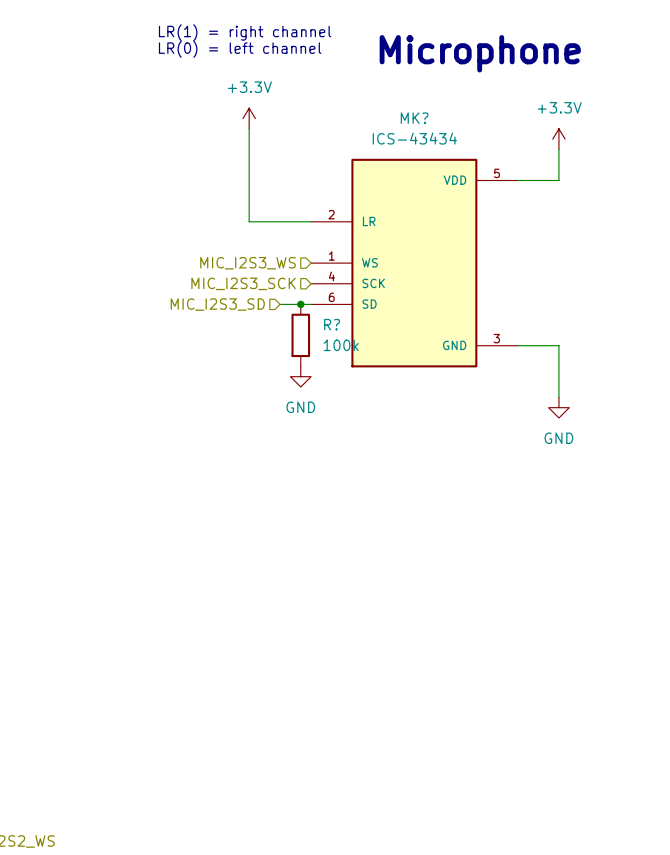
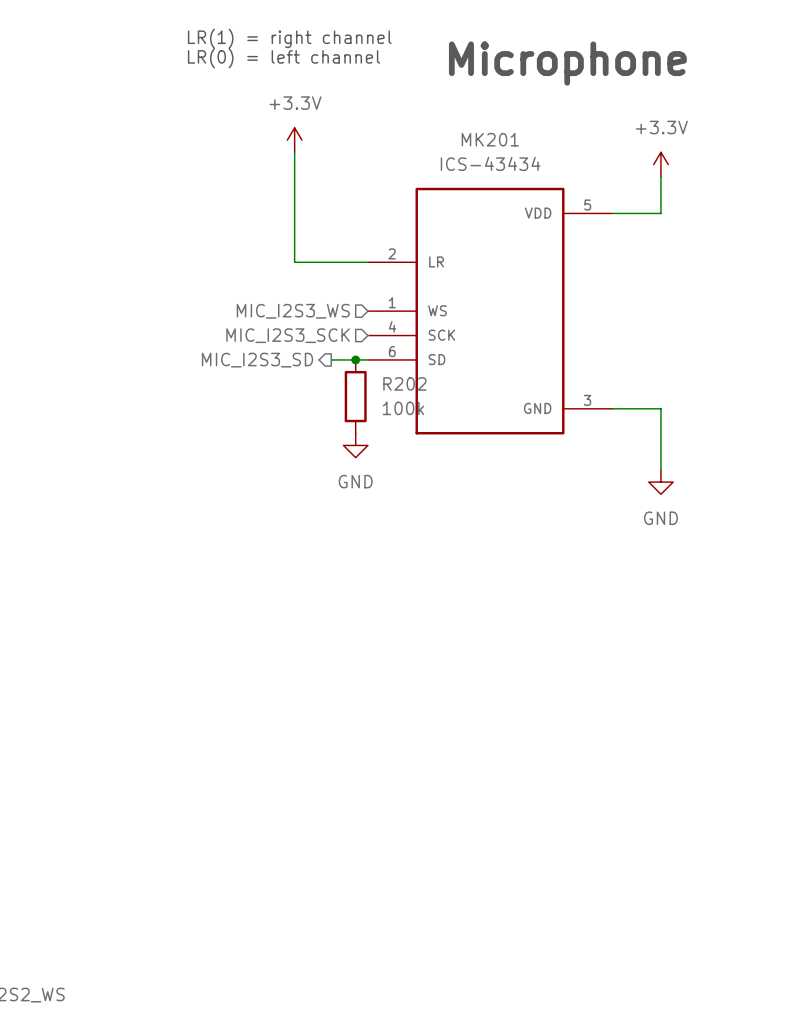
MK? name: MK? (414, 118) -> MK201 (490, 139)
hierarchical label shape: input (217, 304) -> output (257, 360)
R? name: R? (332, 324) -> R202 (404, 383)

